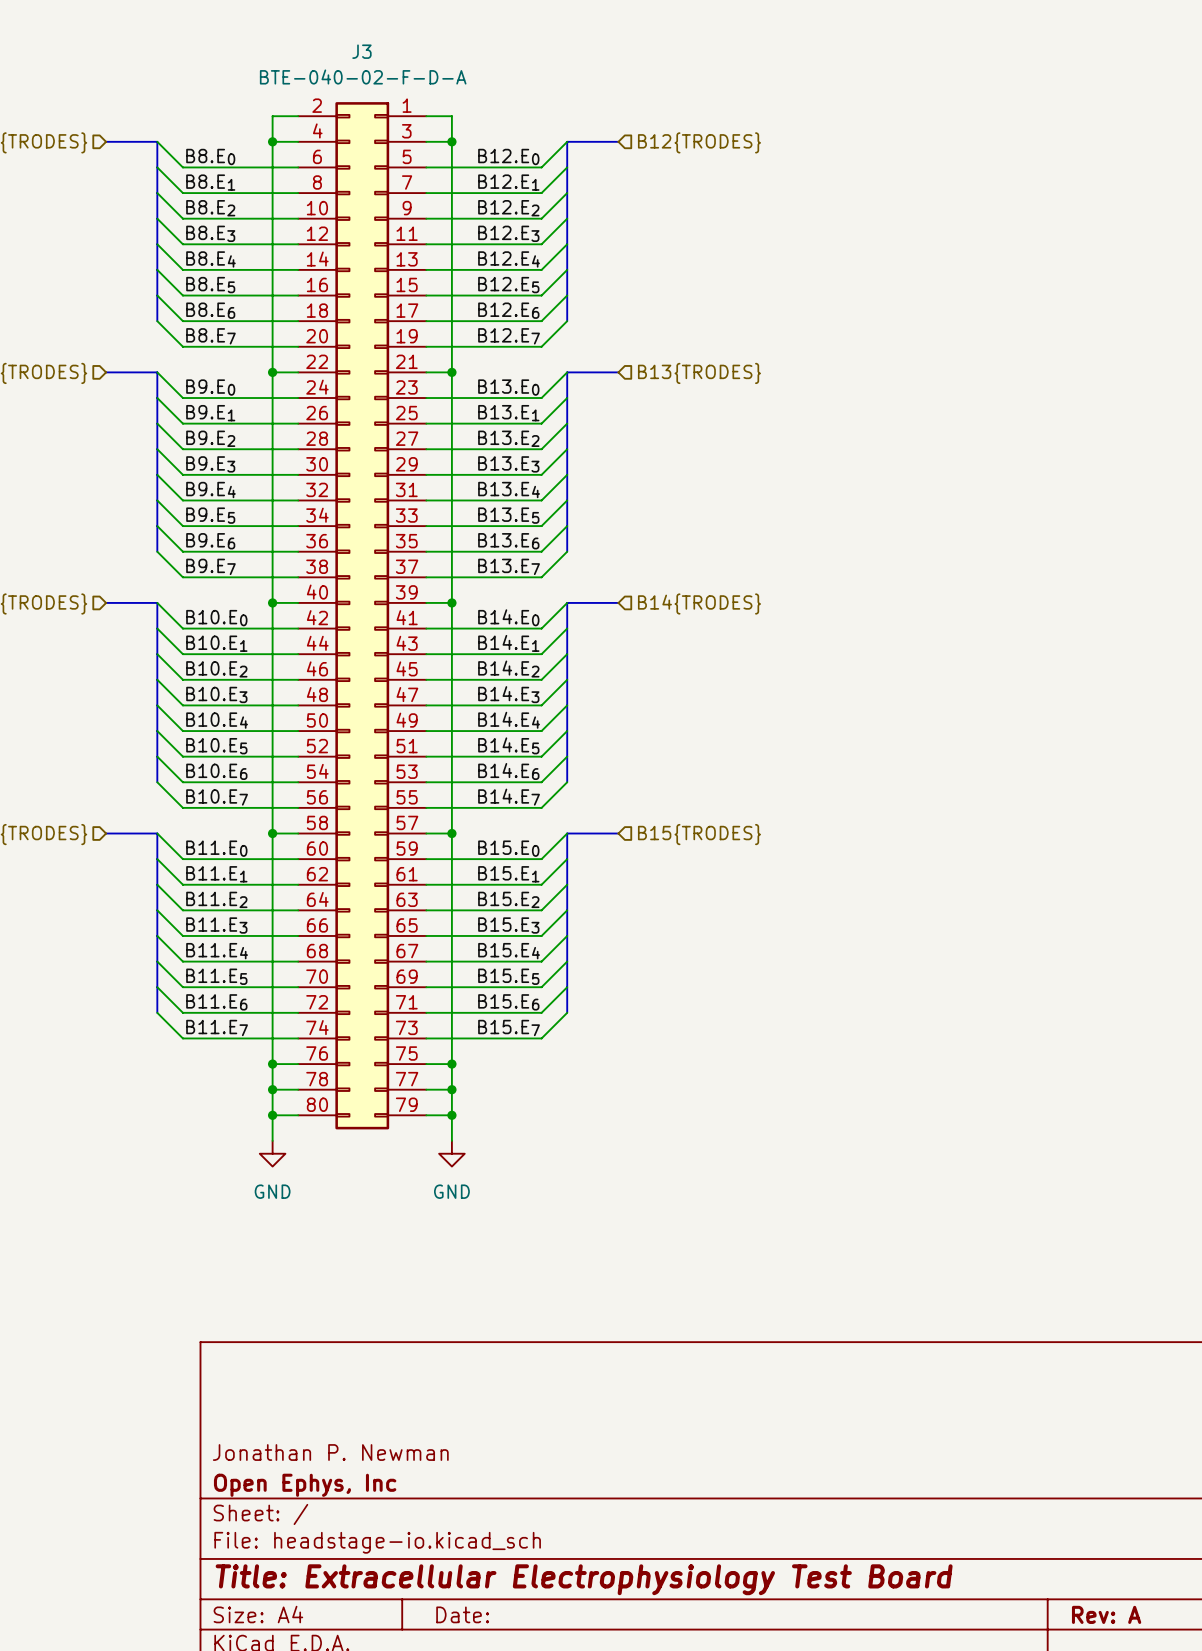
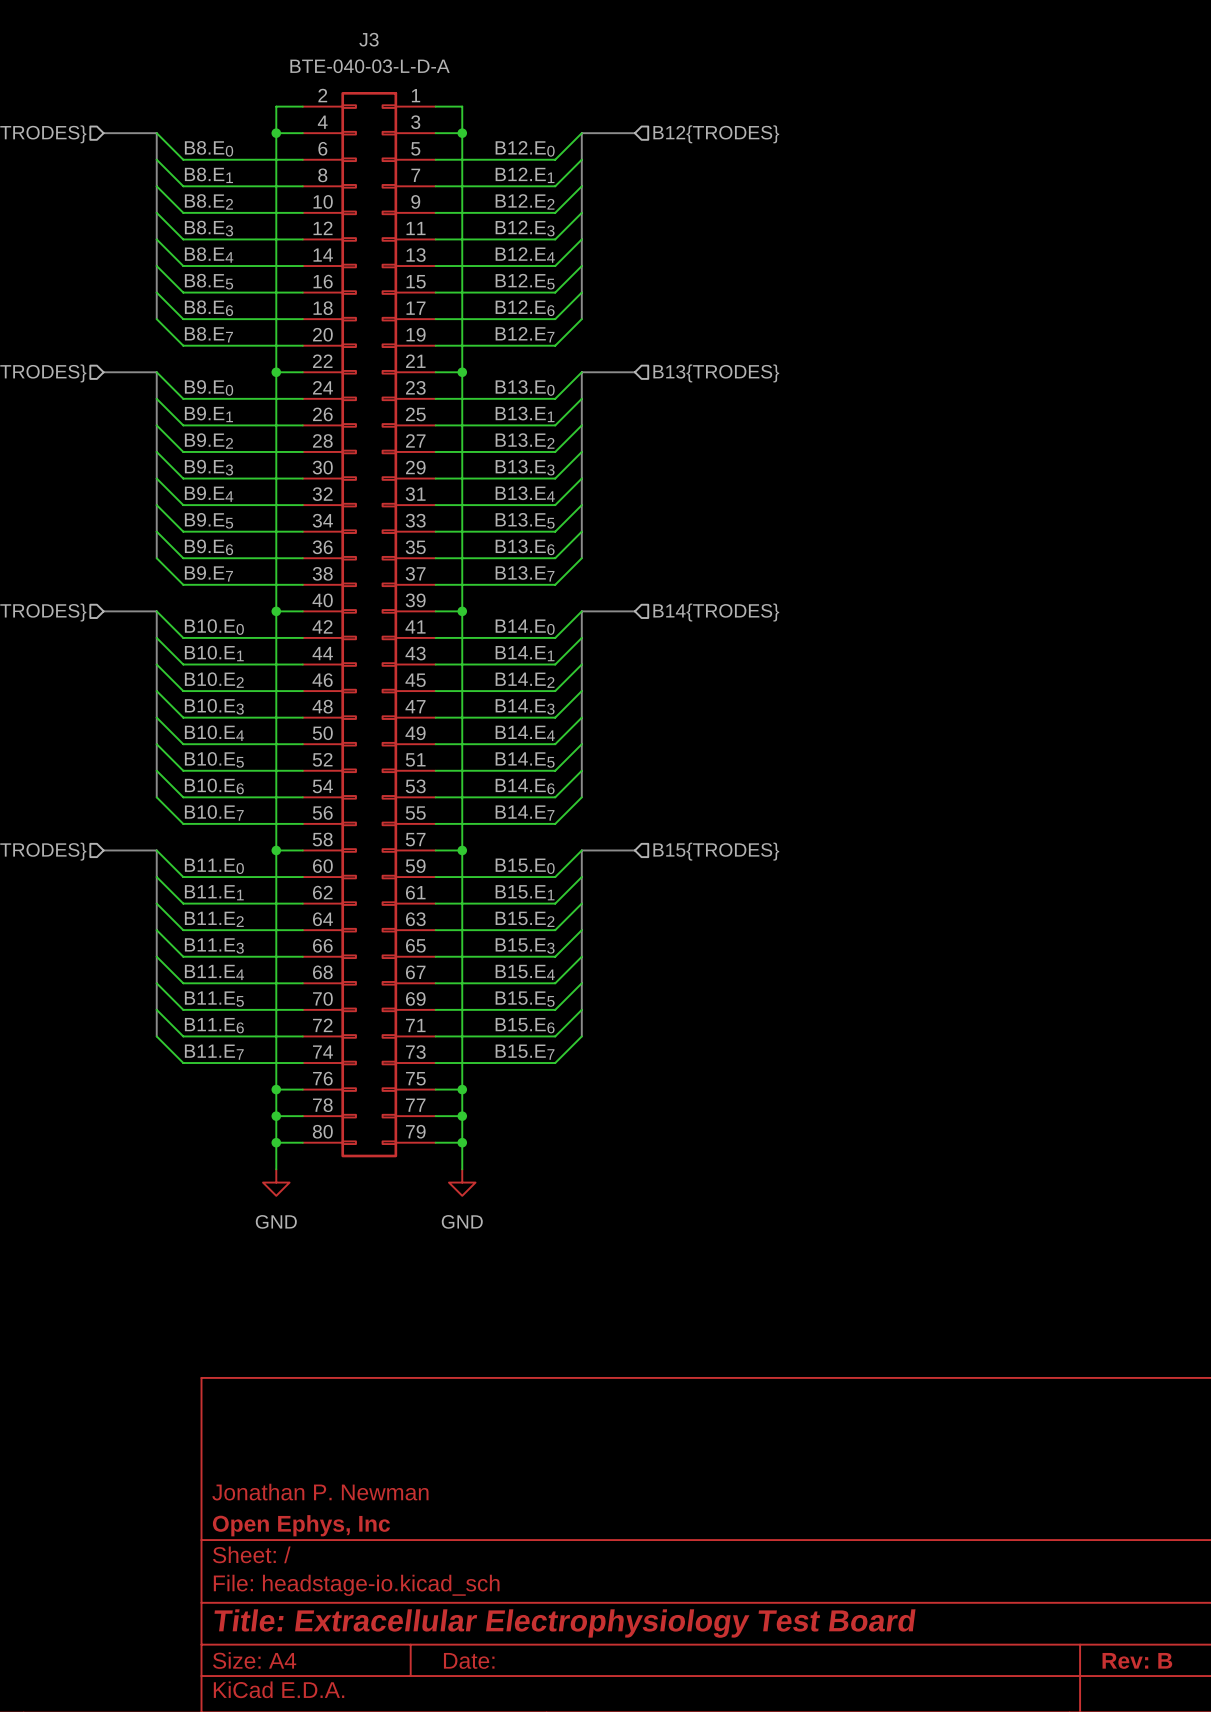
J3 value: BTE-040-02-F-D-A (363, 77) -> BTE-040-03-L-D-A (370, 66)
title block: Rev: A (1106, 1614) -> Rev: B (1137, 1660)

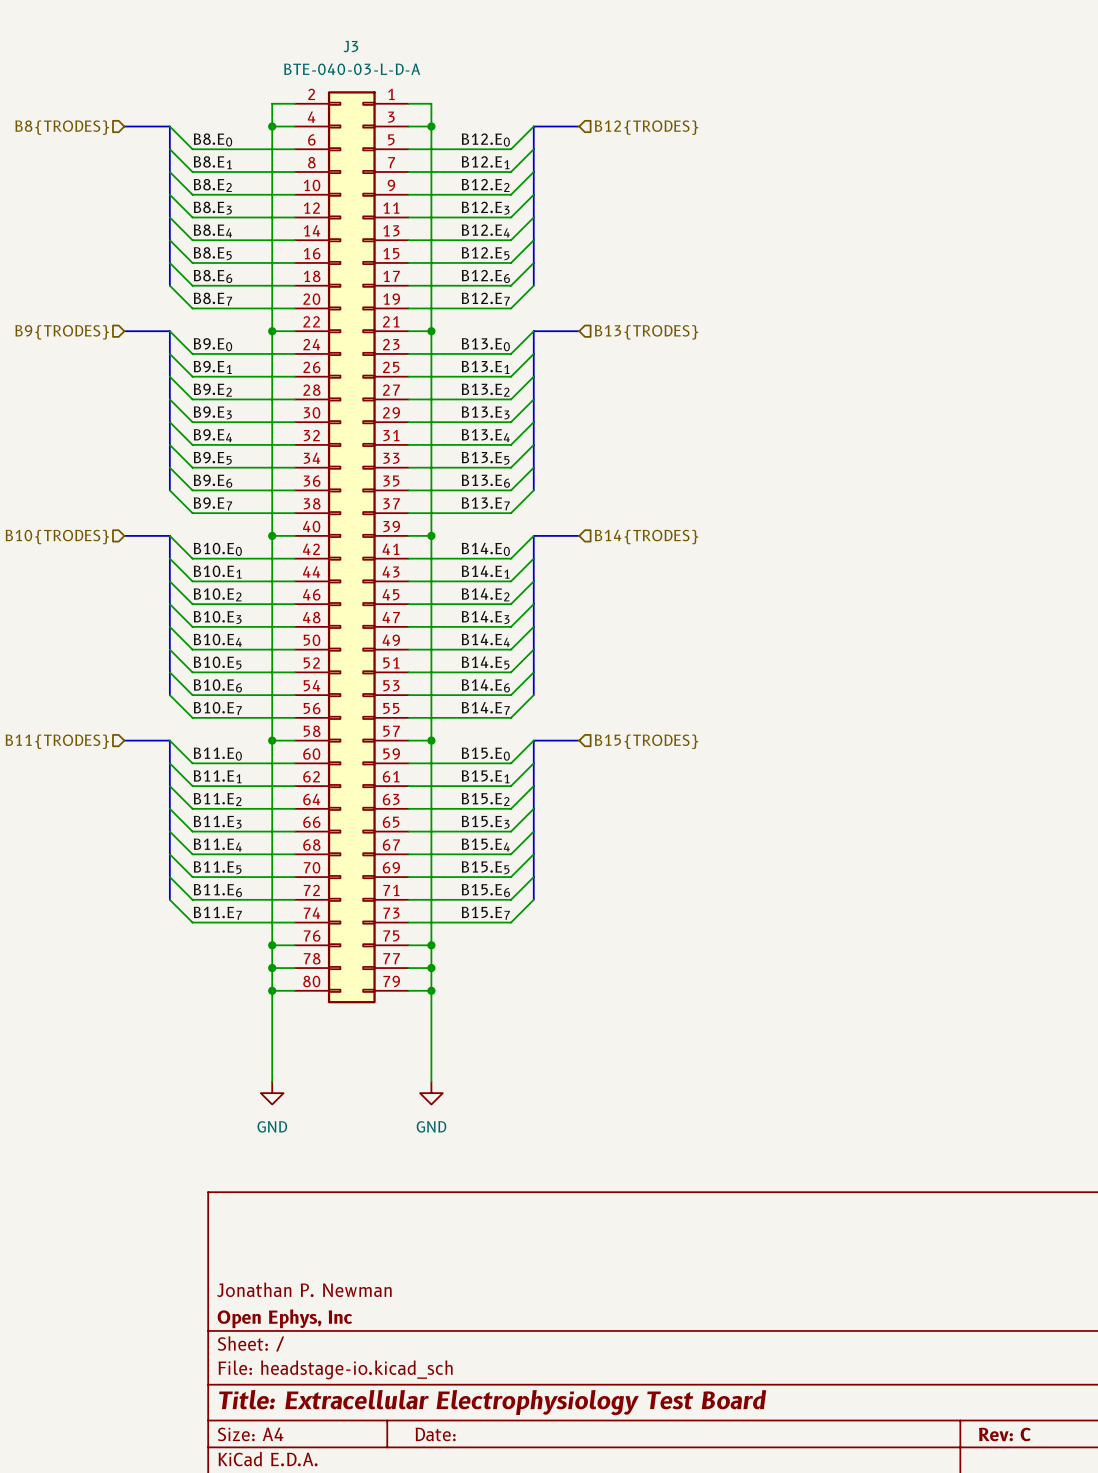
wire: none -> (272, 1013) (272, 1081)
wire: none -> (431, 1013) (431, 1081)
power symbol position: GND (276, 1182) -> GND (272, 1093)
power symbol position: GND (462, 1182) -> GND (431, 1093)
title block: Rev: B (1137, 1660) -> Rev: C (1004, 1434)

